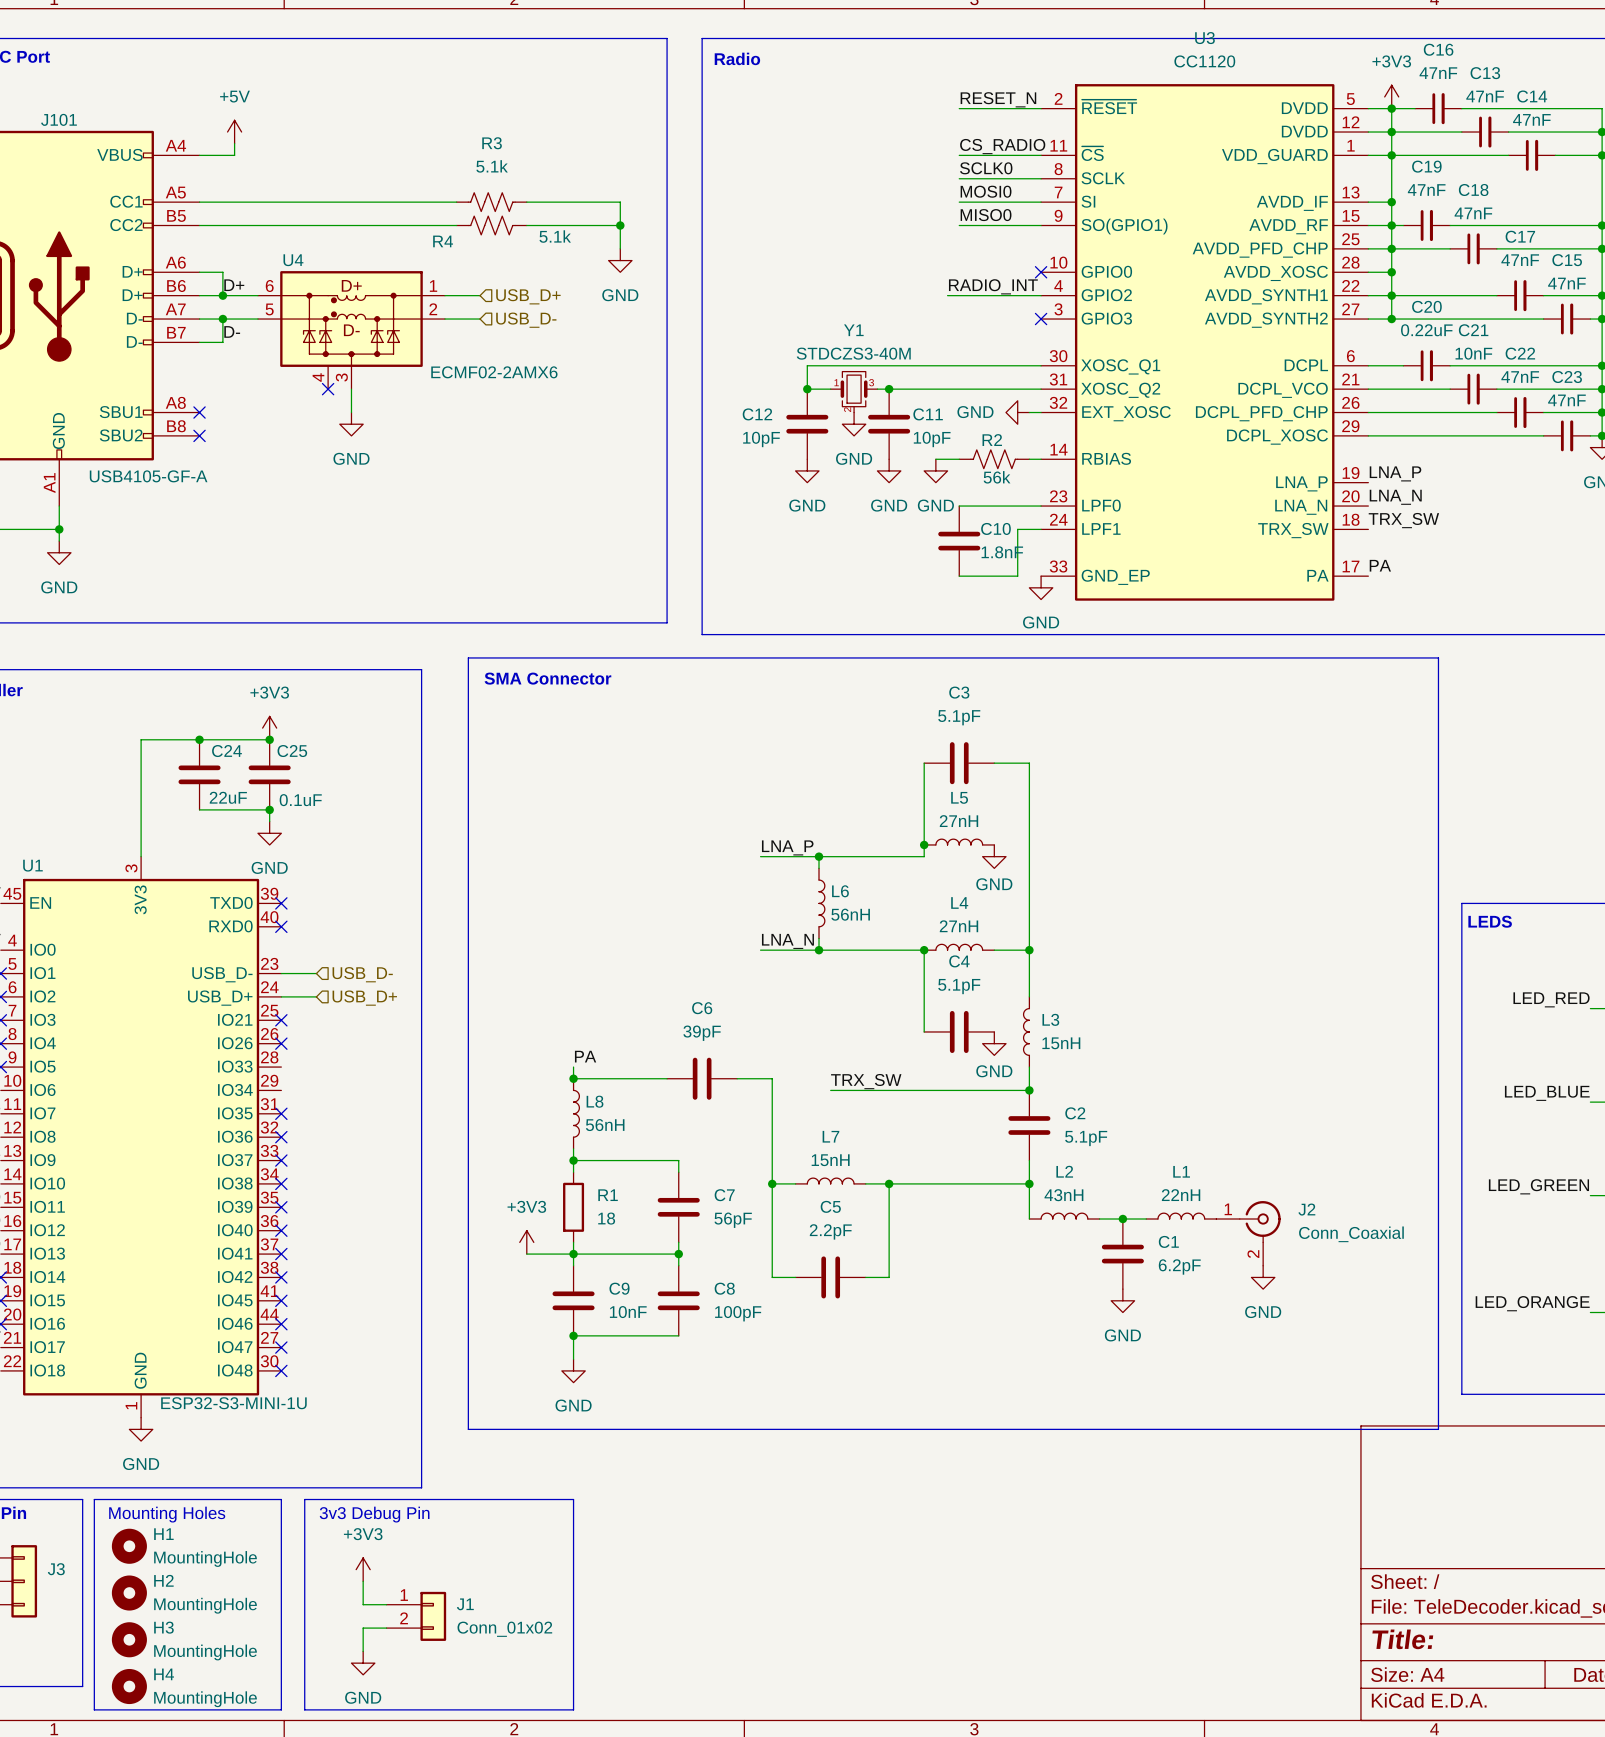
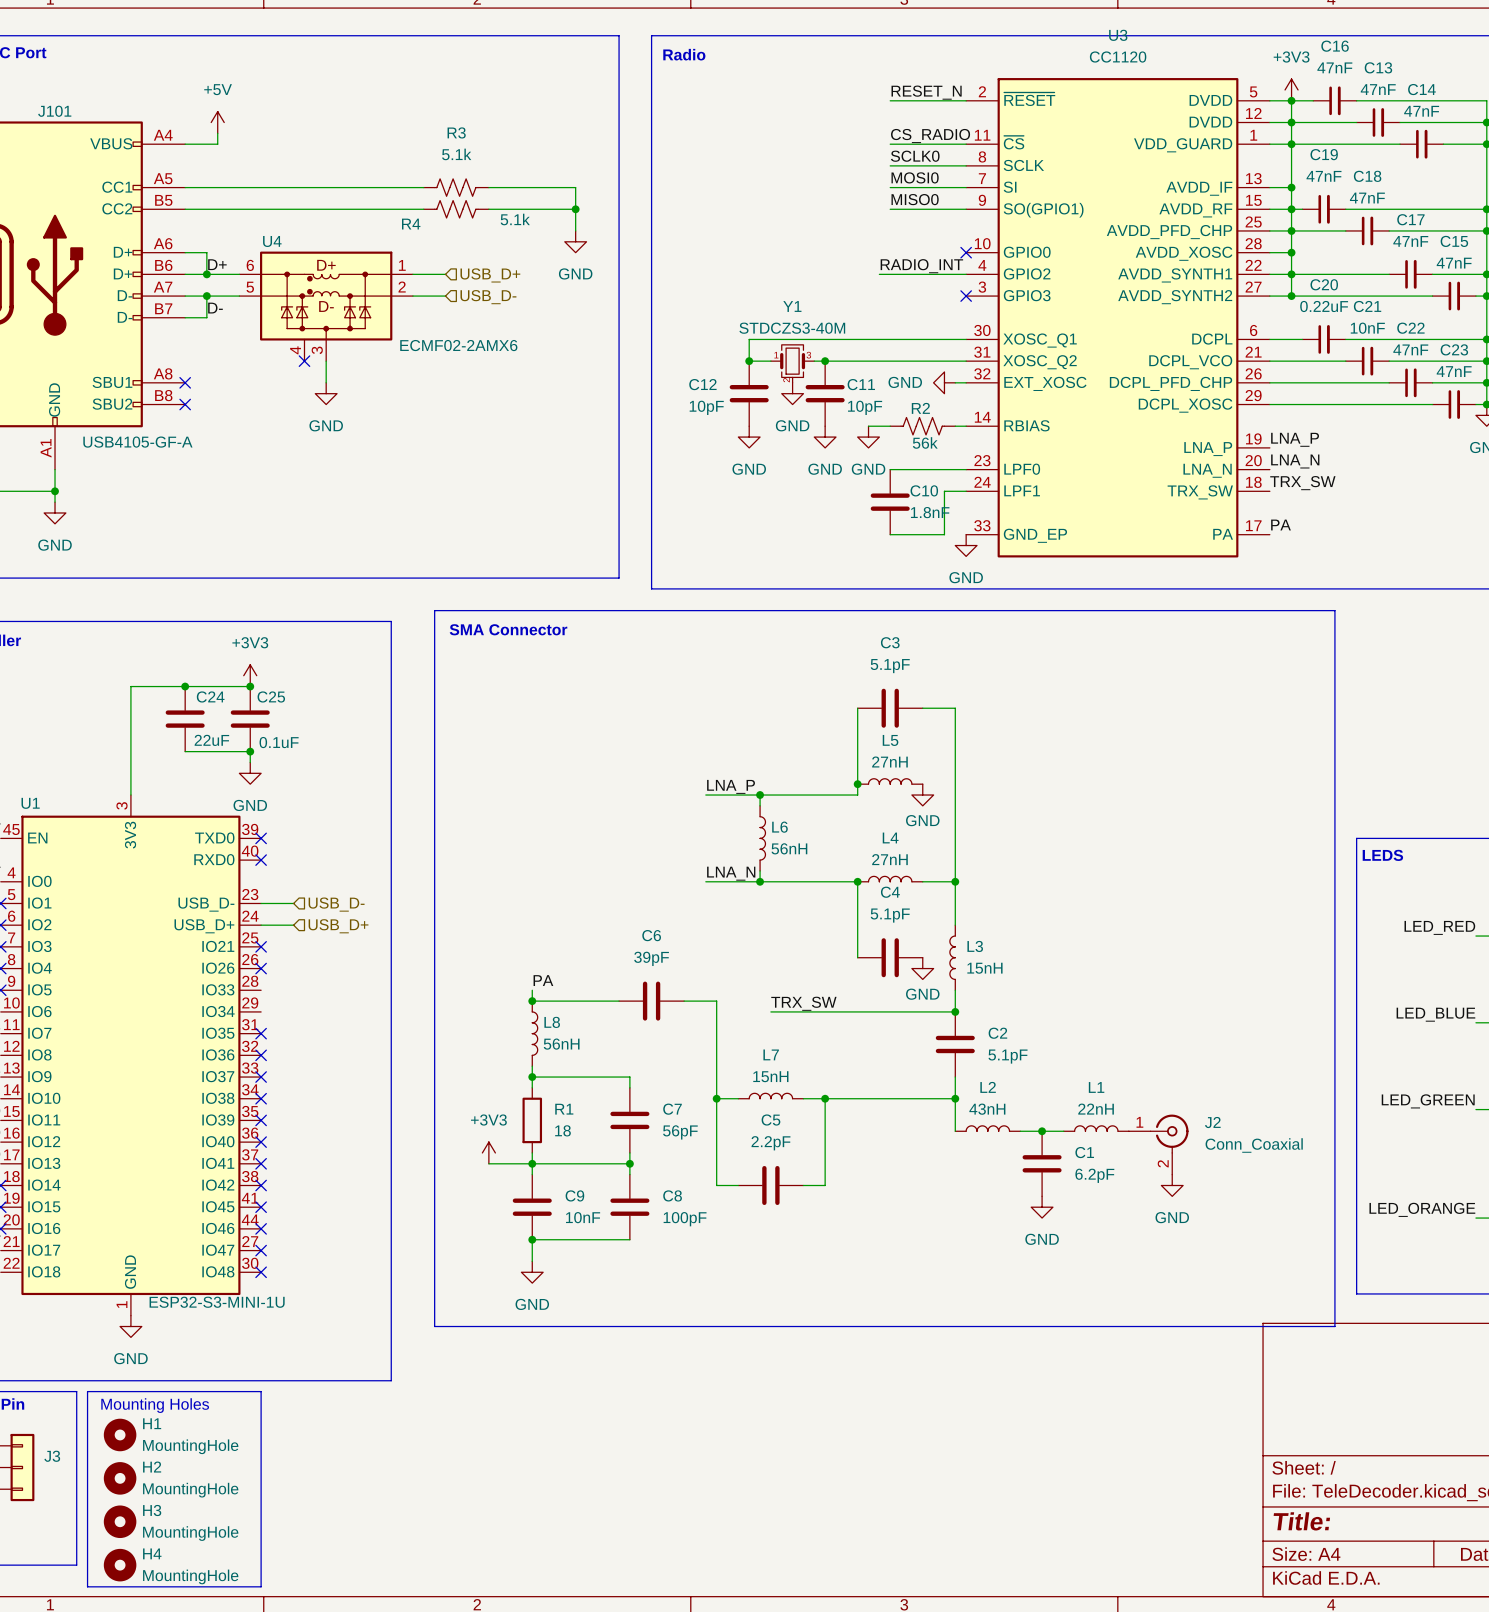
line: (304, 1499) (573, 1499) (573, 1709) (304, 1709) (304, 1499) -> none
text: 3v3 Debug Pin (374, 1514) -> none
power symbol: +3V3 (363, 1569) -> none
wire: (363, 1581) (363, 1604) (386, 1604) -> none
J1: Conn_01x02 (416, 1616) -> none
wire: (386, 1628) (363, 1628) (363, 1651) -> none
power symbol: GND (363, 1663) -> none

